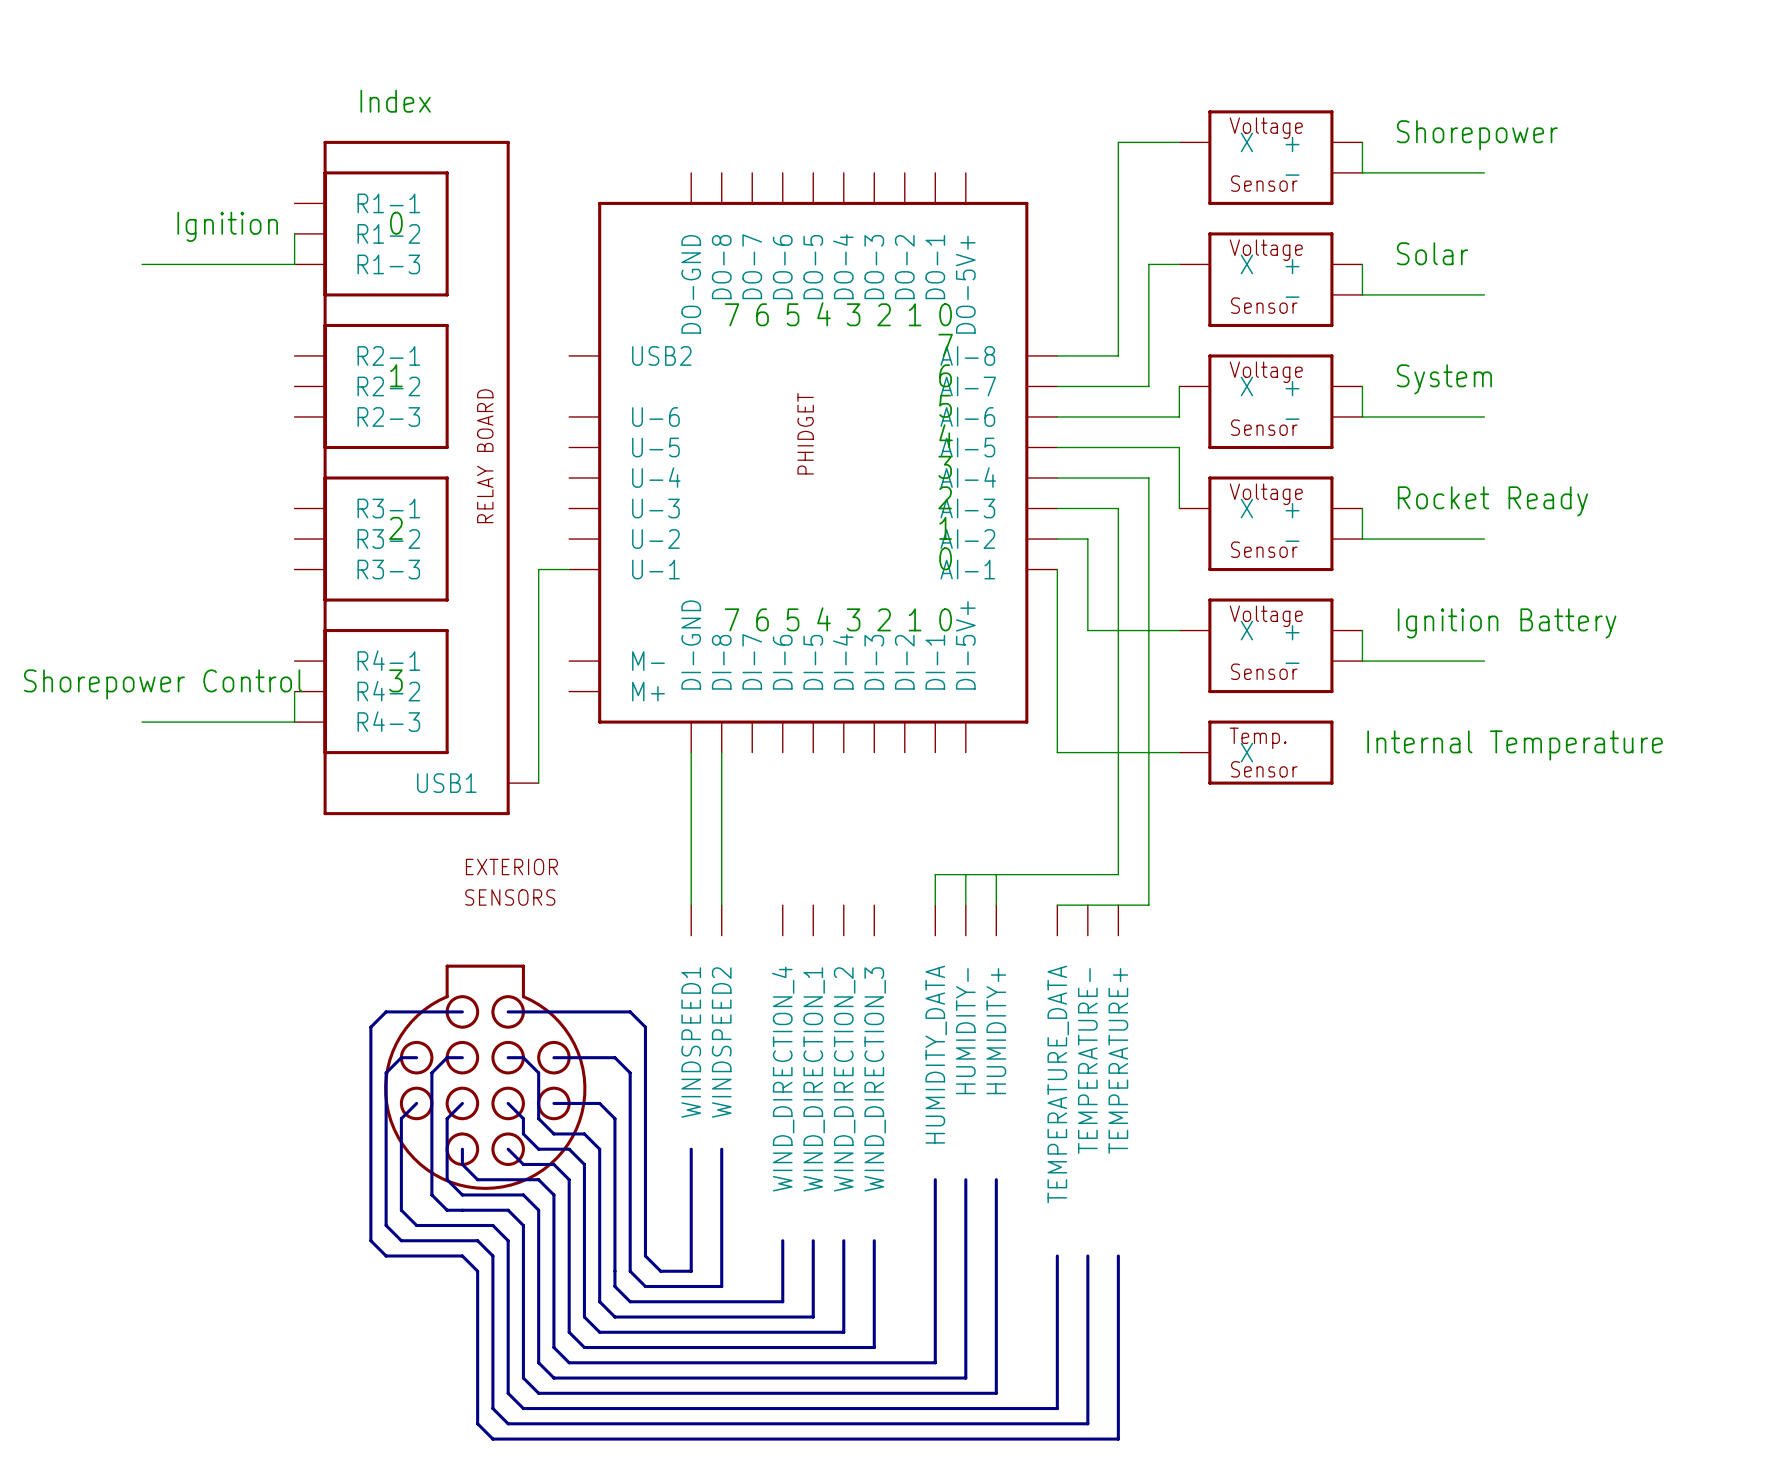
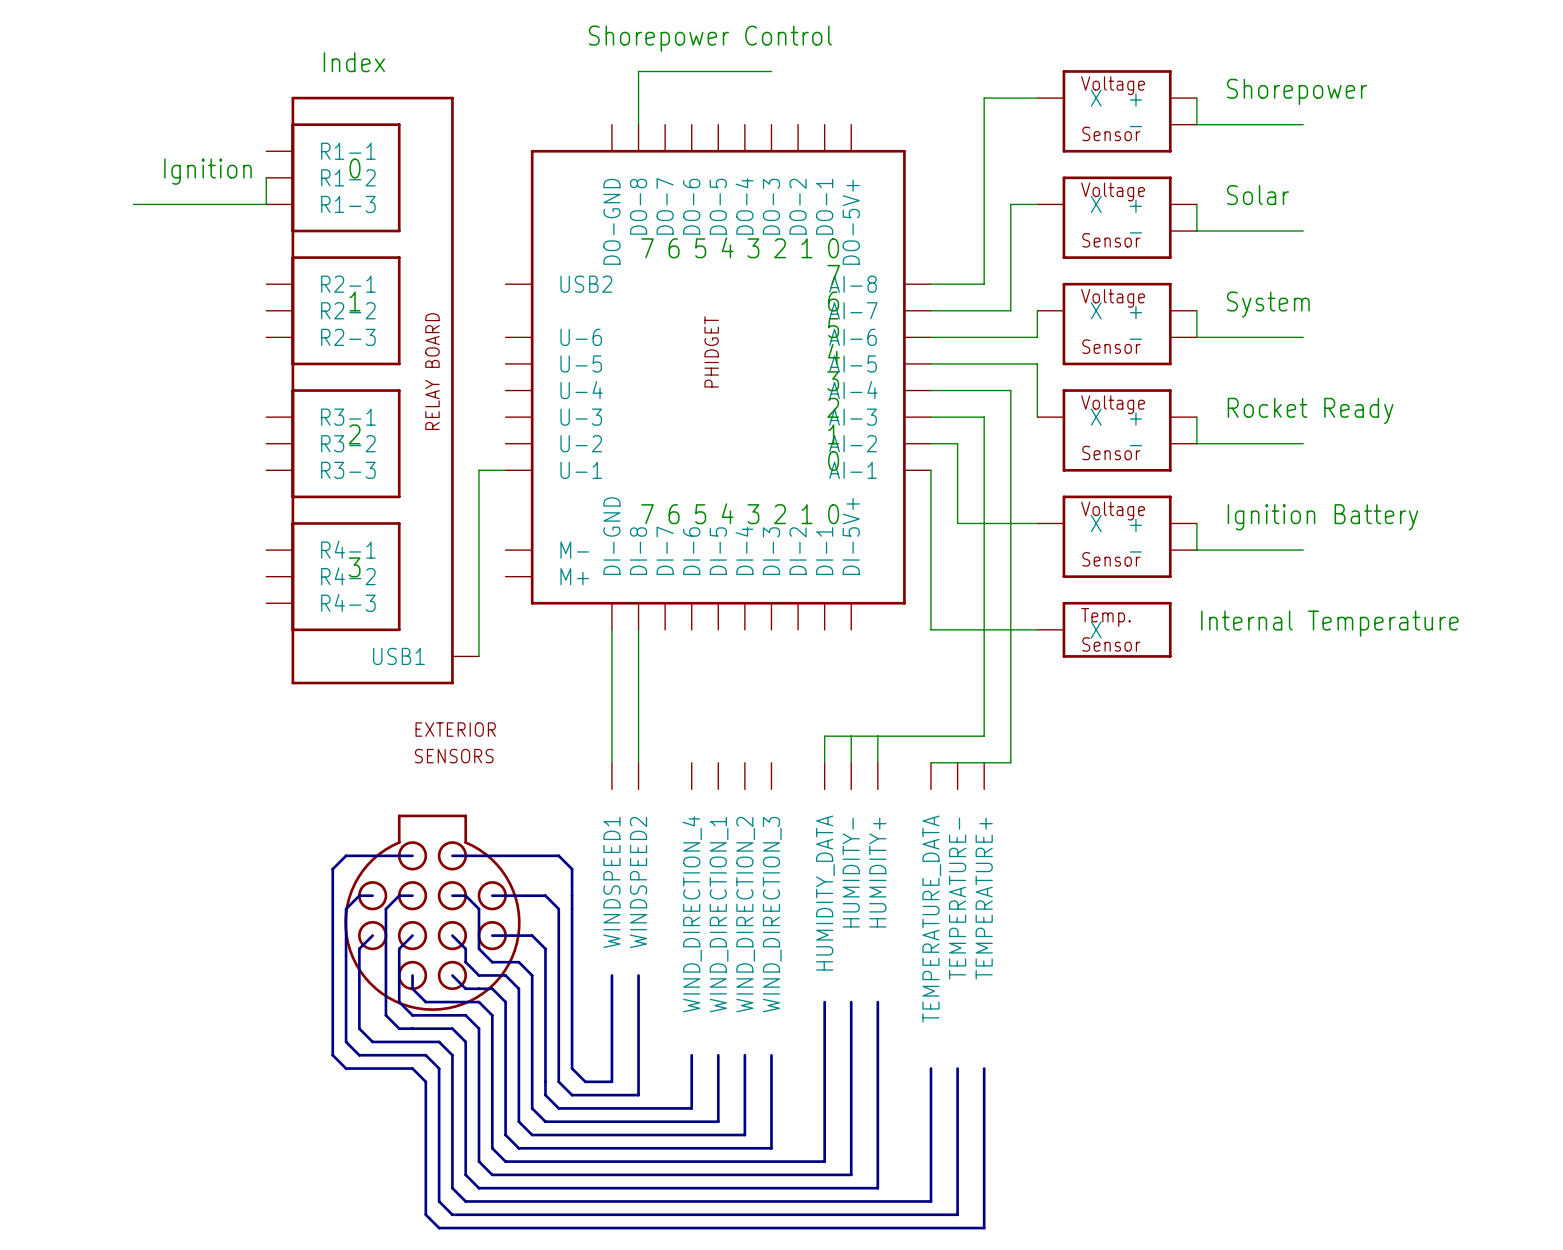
text: none -> Shorepower Control (710, 38)
wire: none -> (771, 71) (638, 71) (638, 124)
text: Shorepower Control (163, 684) -> none
wire: (294, 691) (294, 722) (142, 722) -> none

